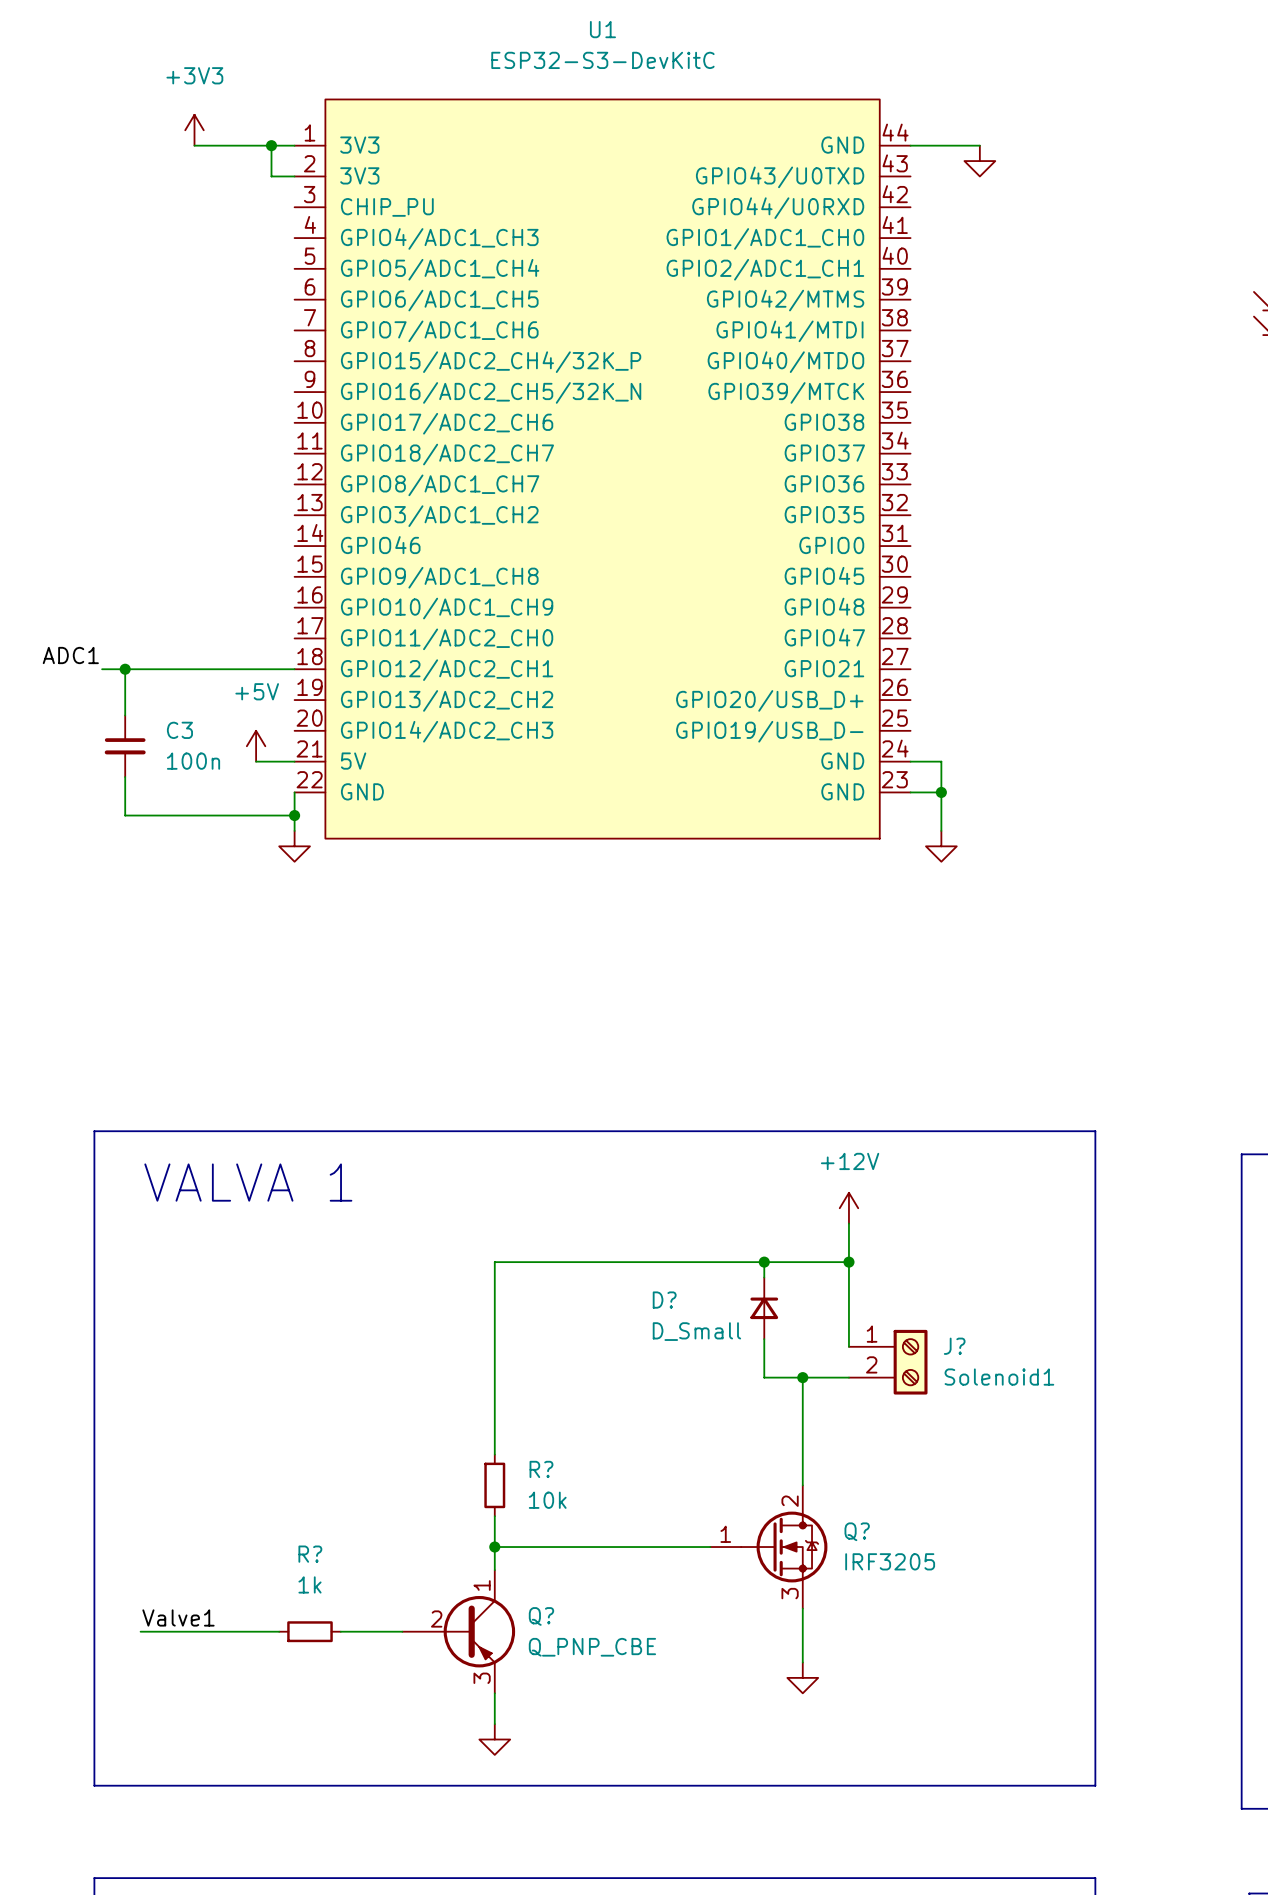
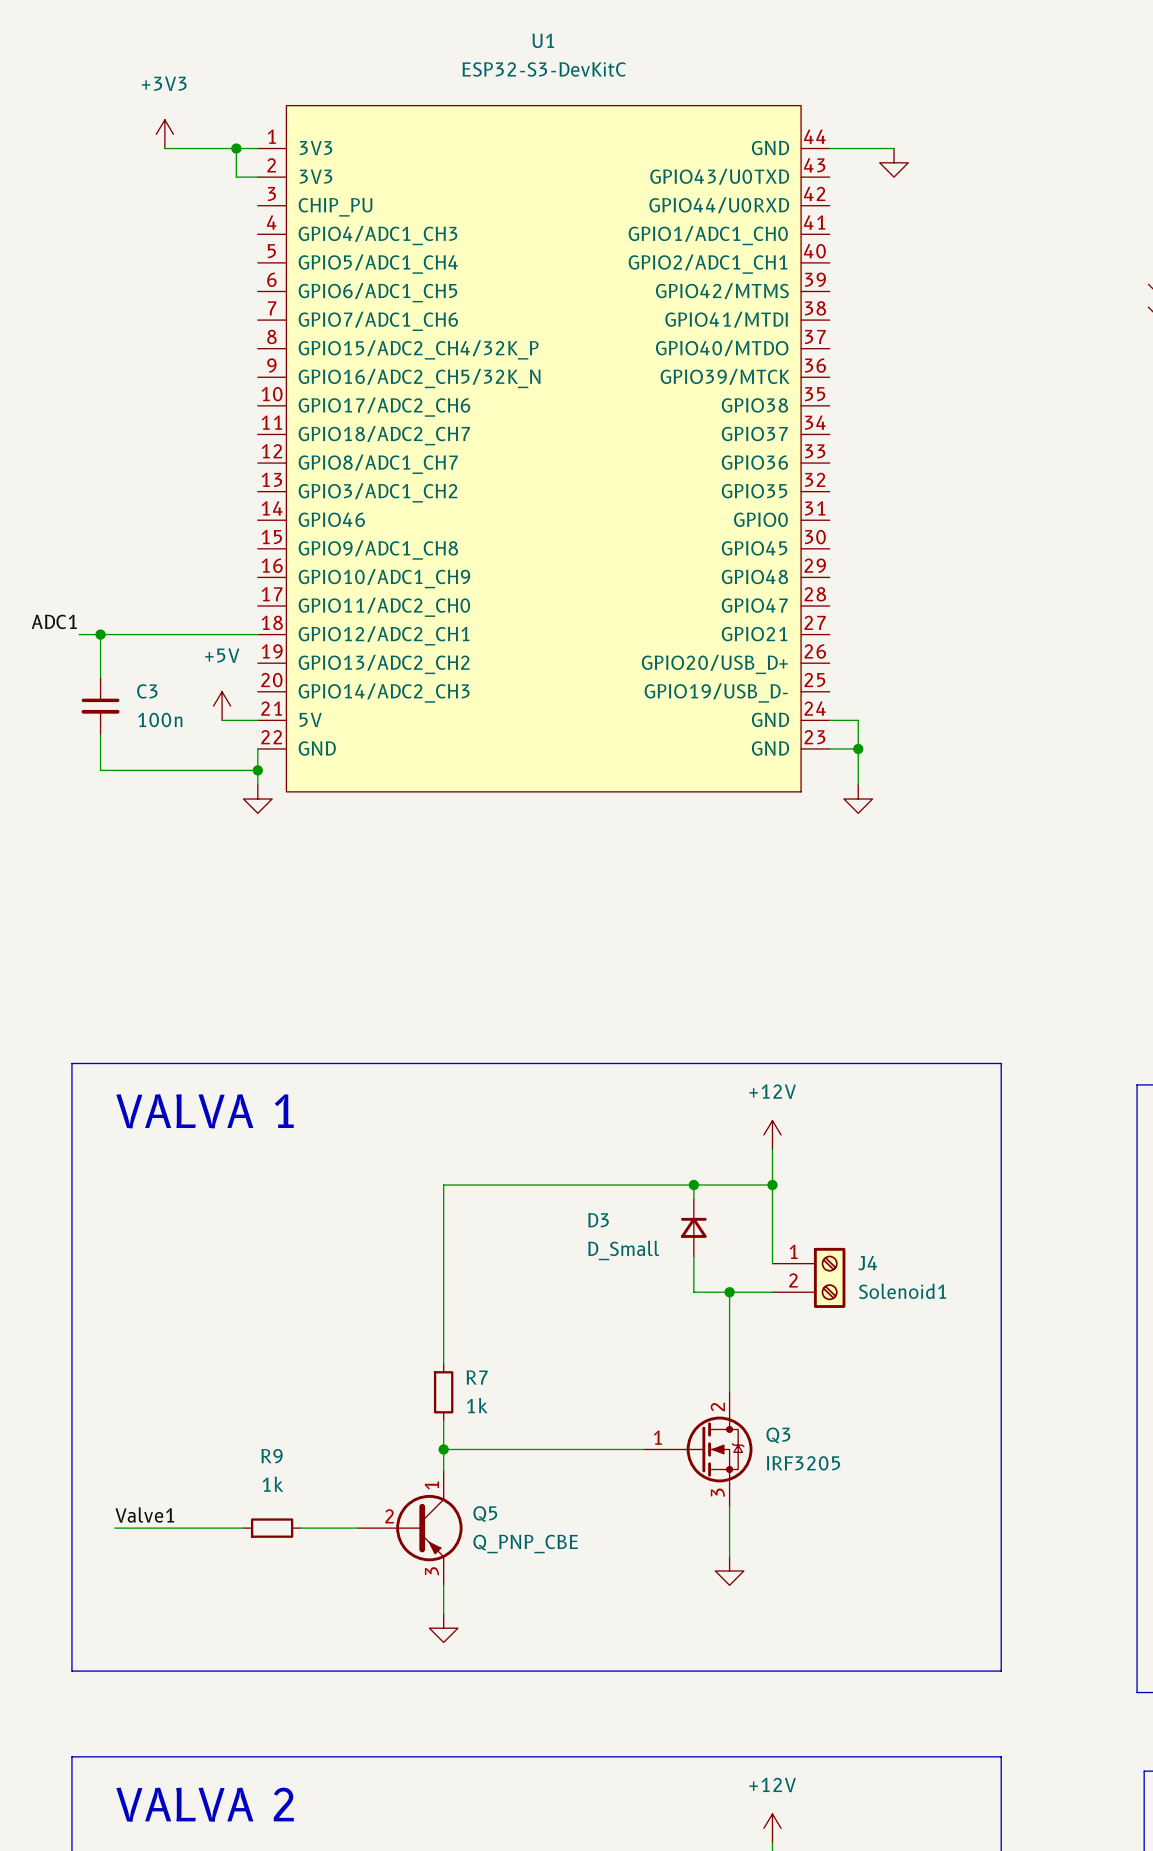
D? name: D? (664, 1300) -> D3 (598, 1220)
J? name: J? (954, 1346) -> J4 (867, 1263)
R? name: R? (541, 1469) -> R7 (477, 1377)
R? value: 10k (547, 1500) -> 1k (477, 1405)
Q? name: Q? (857, 1531) -> Q3 (778, 1435)
R? name: R? (310, 1554) -> R9 (272, 1456)
Q? name: Q? (541, 1616) -> Q5 (485, 1513)

